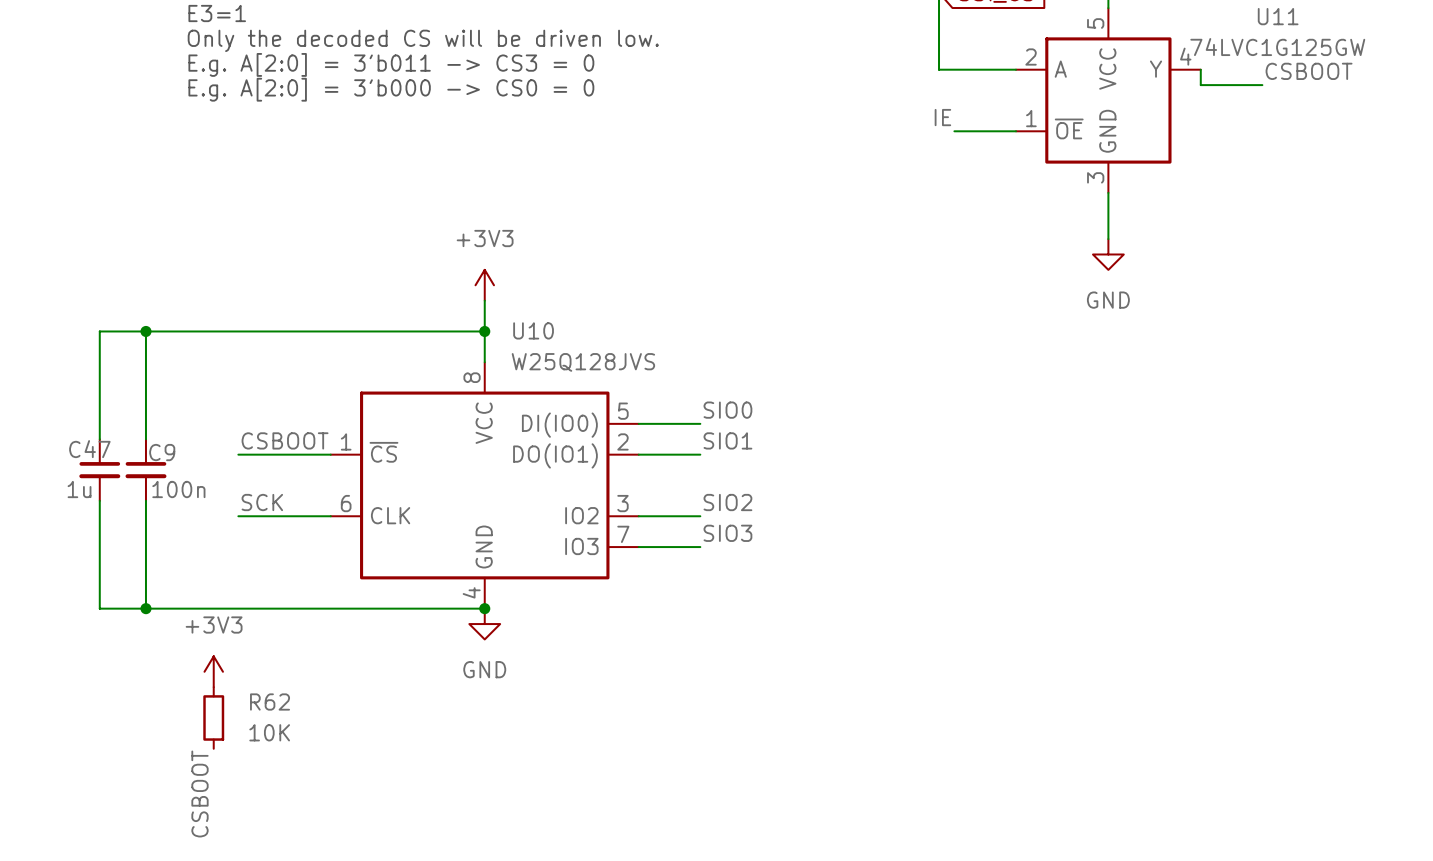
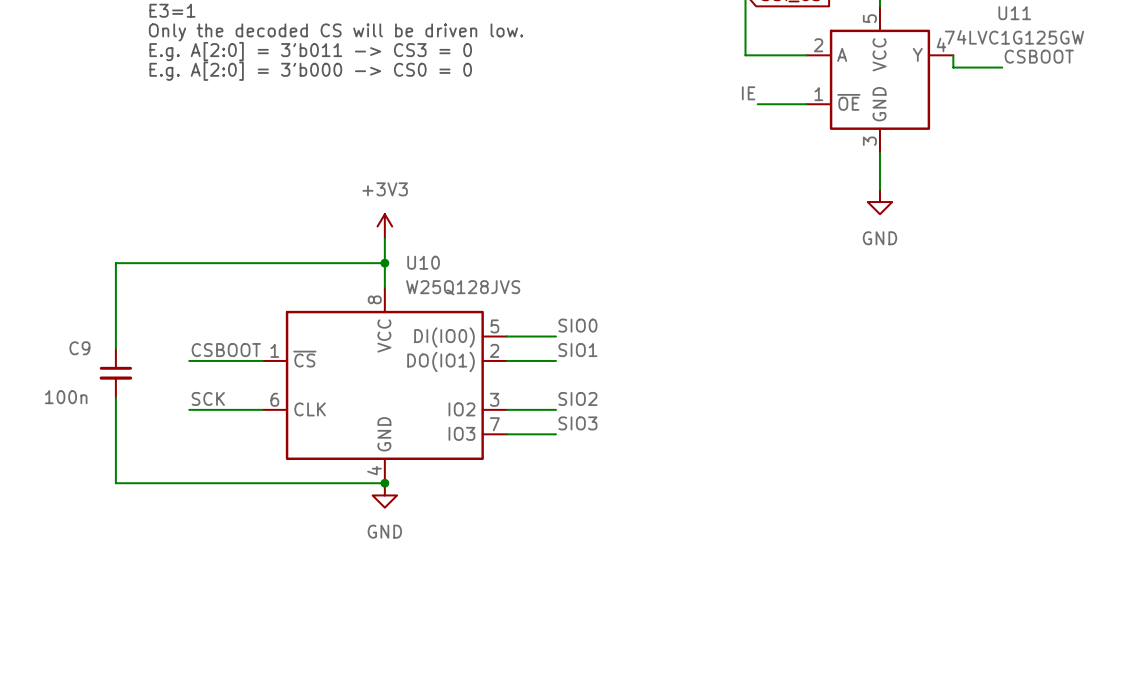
wire: (145, 331) (99, 331) (99, 439) -> none
junction: (145, 331) -> none
C9 name position: C9 (162, 452) -> C9 (79, 348)
C47: 1u (99, 470) -> none
C9 value position: 100n (178, 489) -> 100n (66, 397)
wire: (99, 500) (99, 608) (145, 608) -> none
junction: (145, 608) -> none
power symbol: +3V3 (213, 671) -> none
R62: 10K (213, 717) -> none
label: CSBOOT (199, 793) -> none

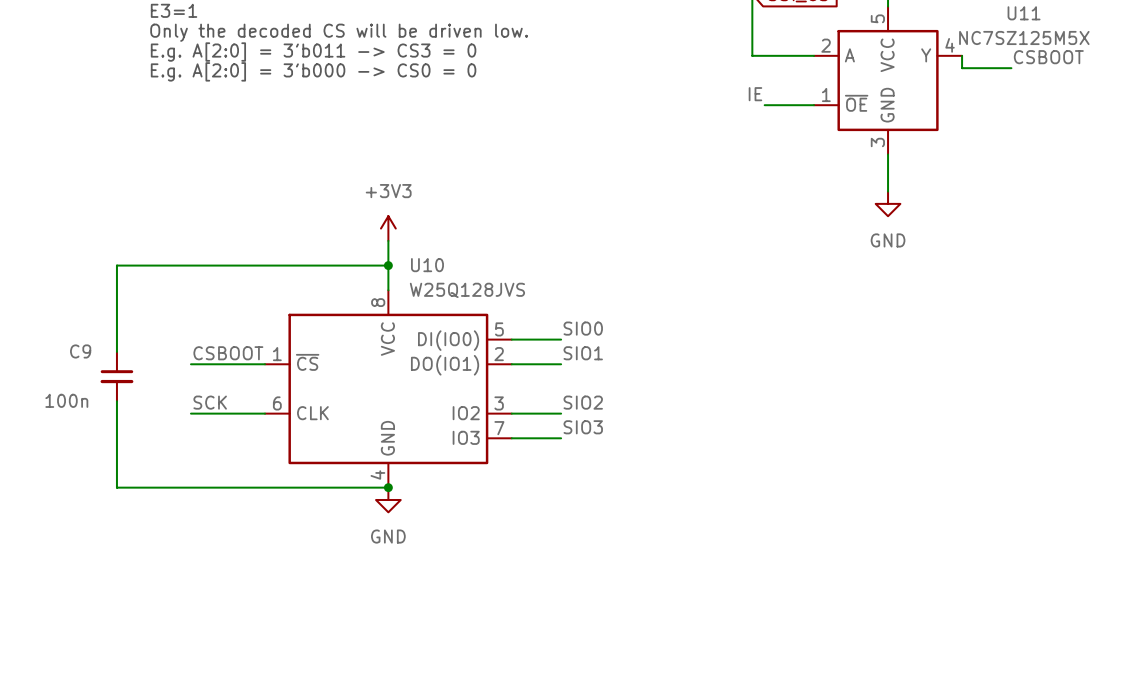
U11 value: 74LVC1G125GW (1014, 37) -> NC7SZ125M5X (1024, 37)

